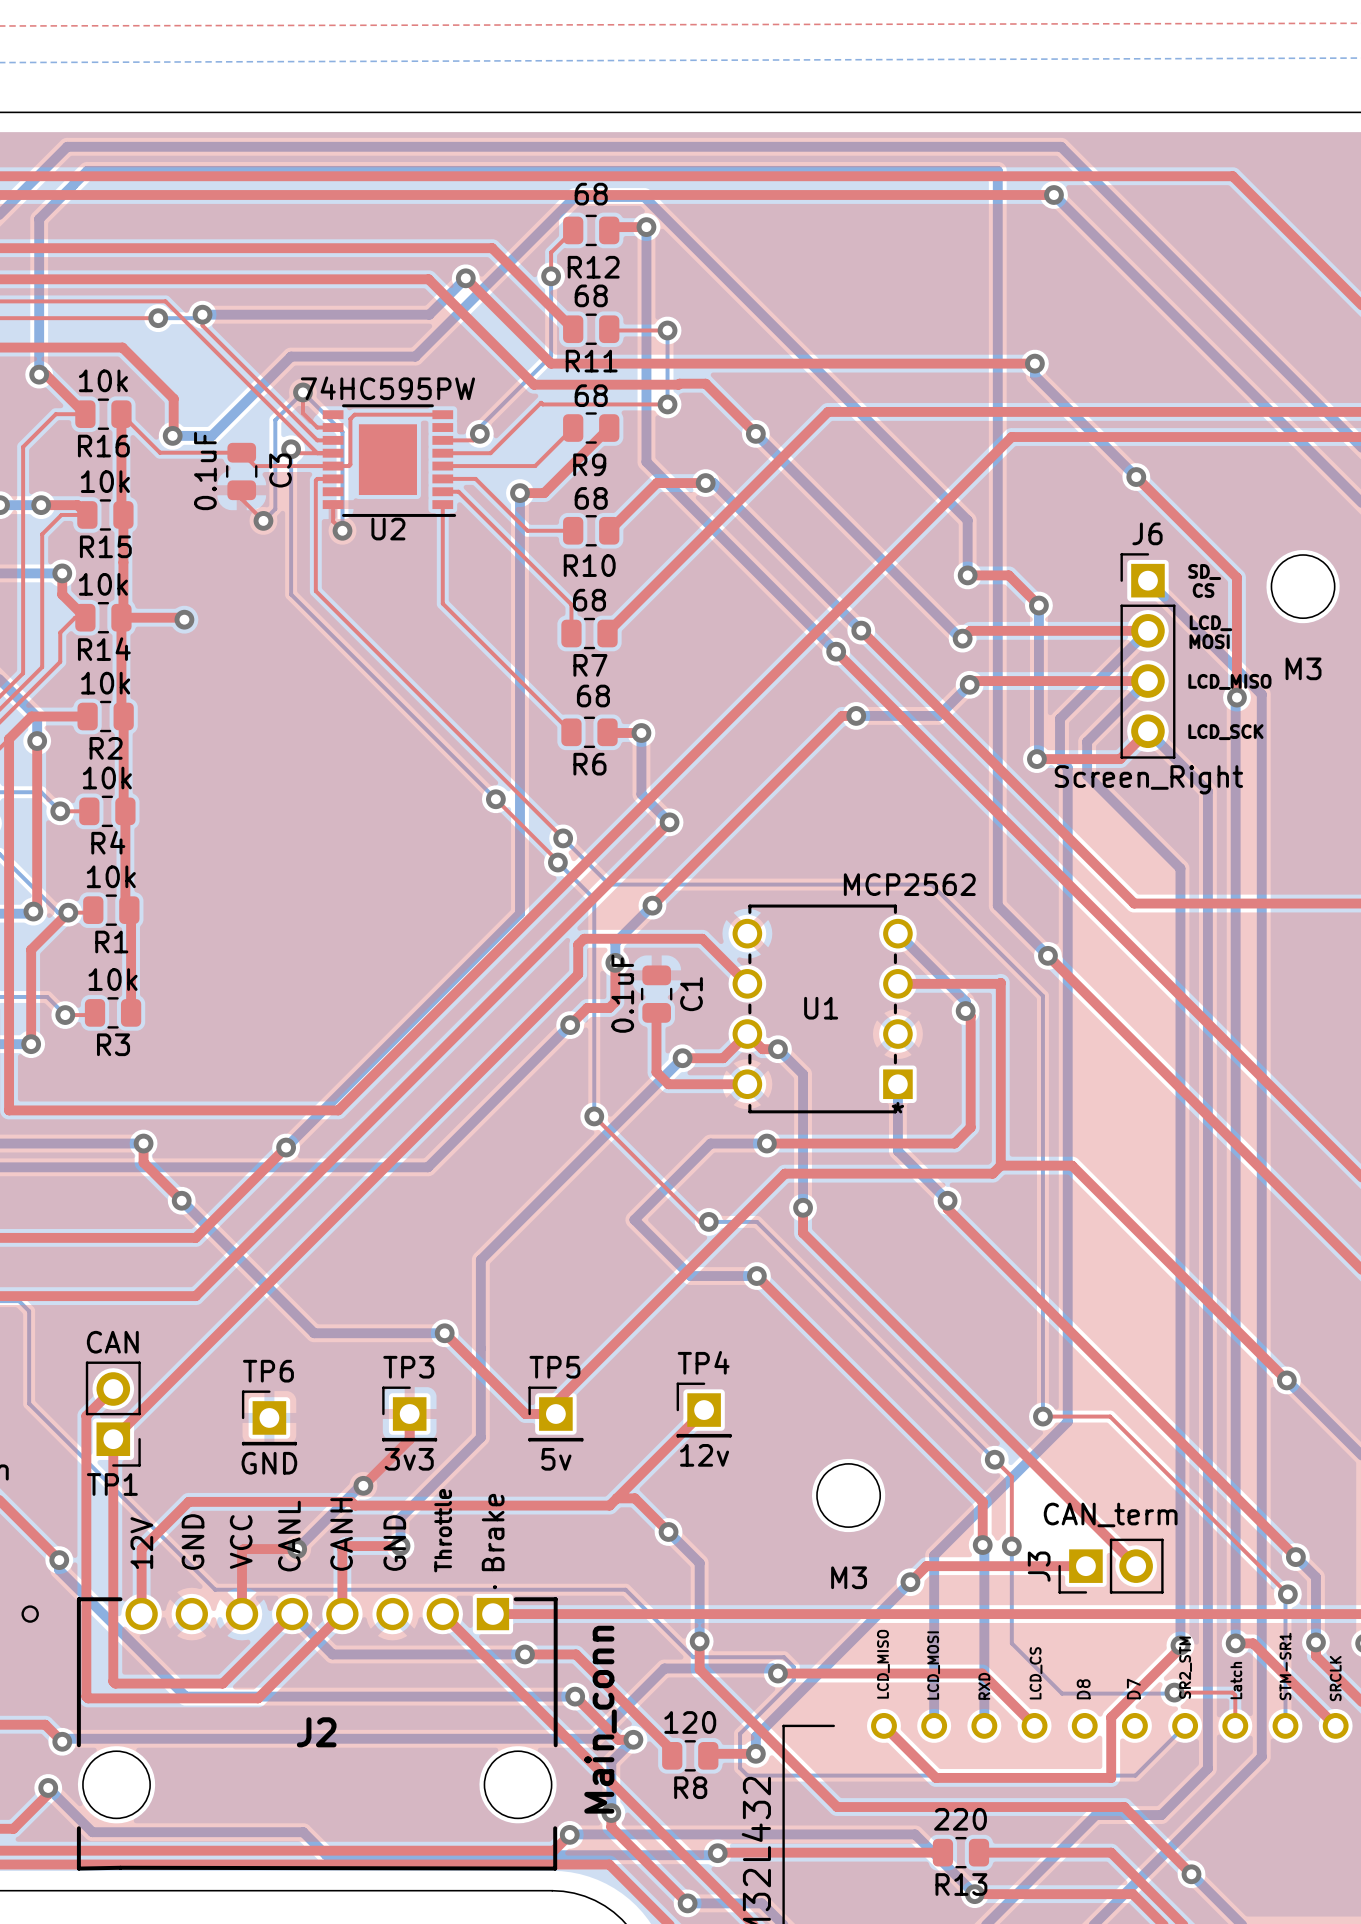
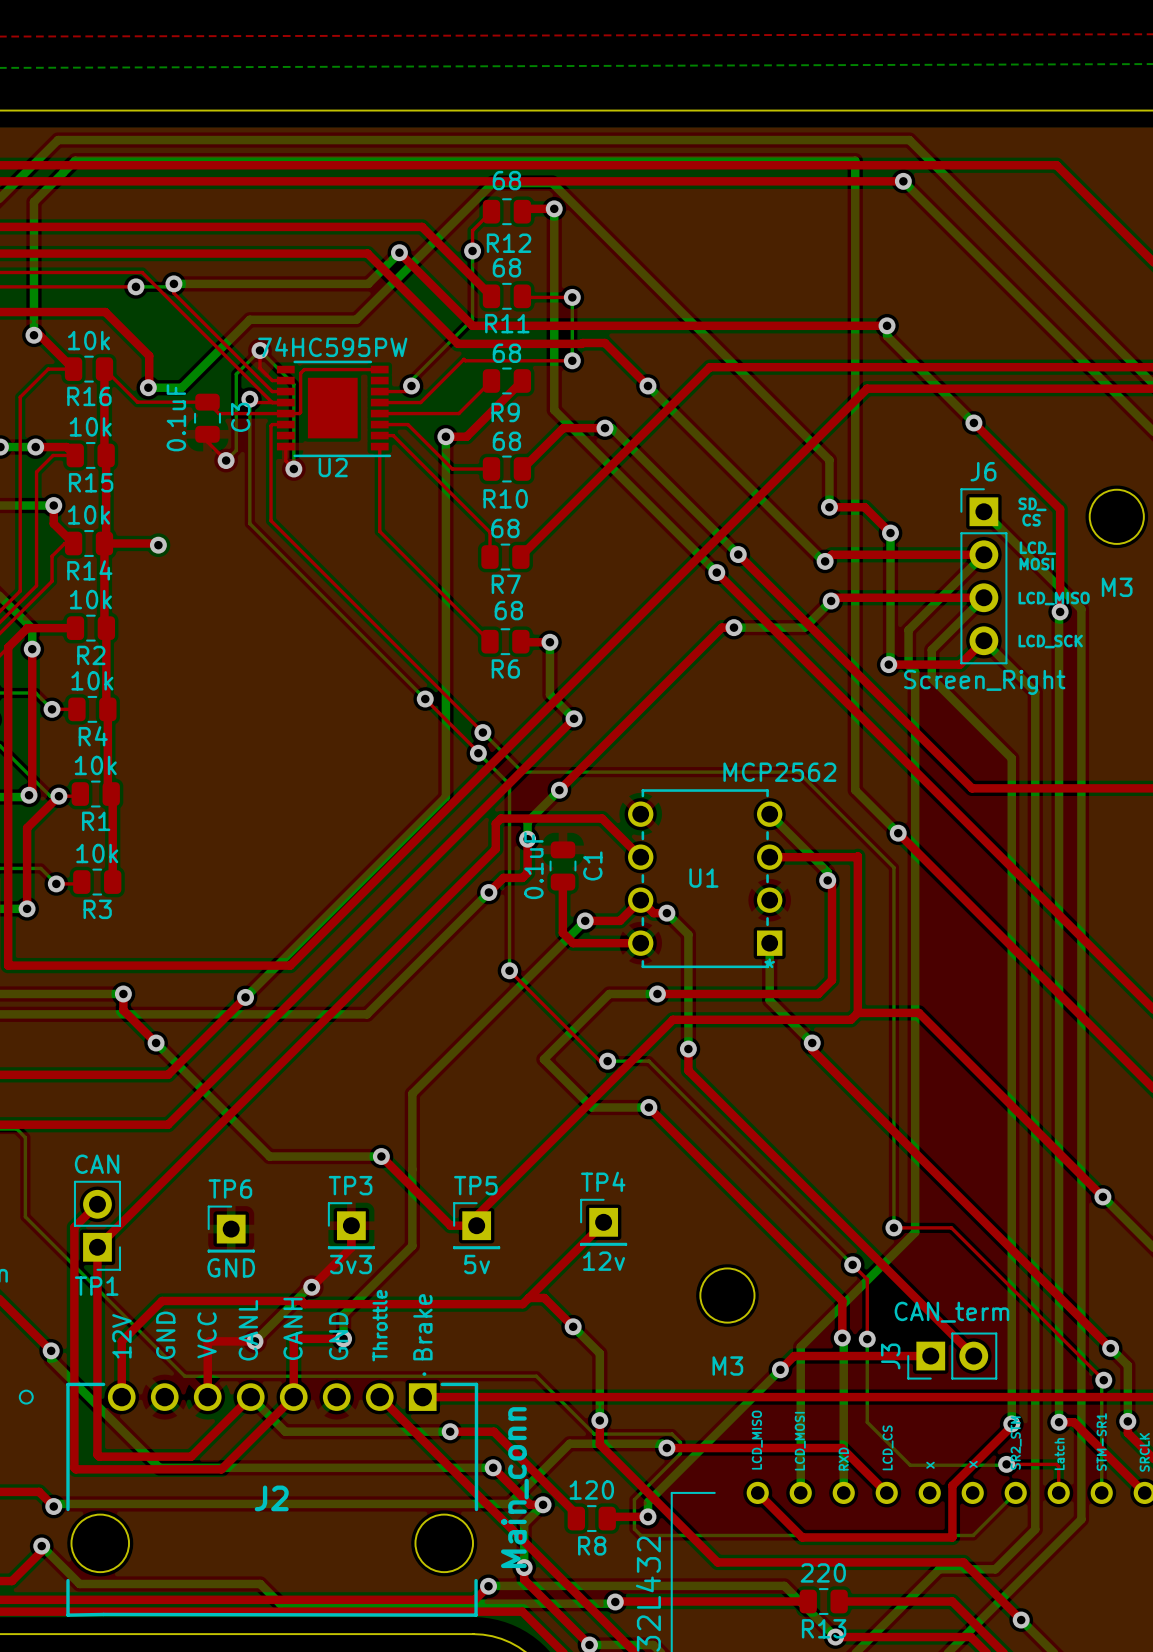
text: D8 (1083, 1689) -> x (930, 1465)
text: D7 (1133, 1689) -> x (973, 1464)

